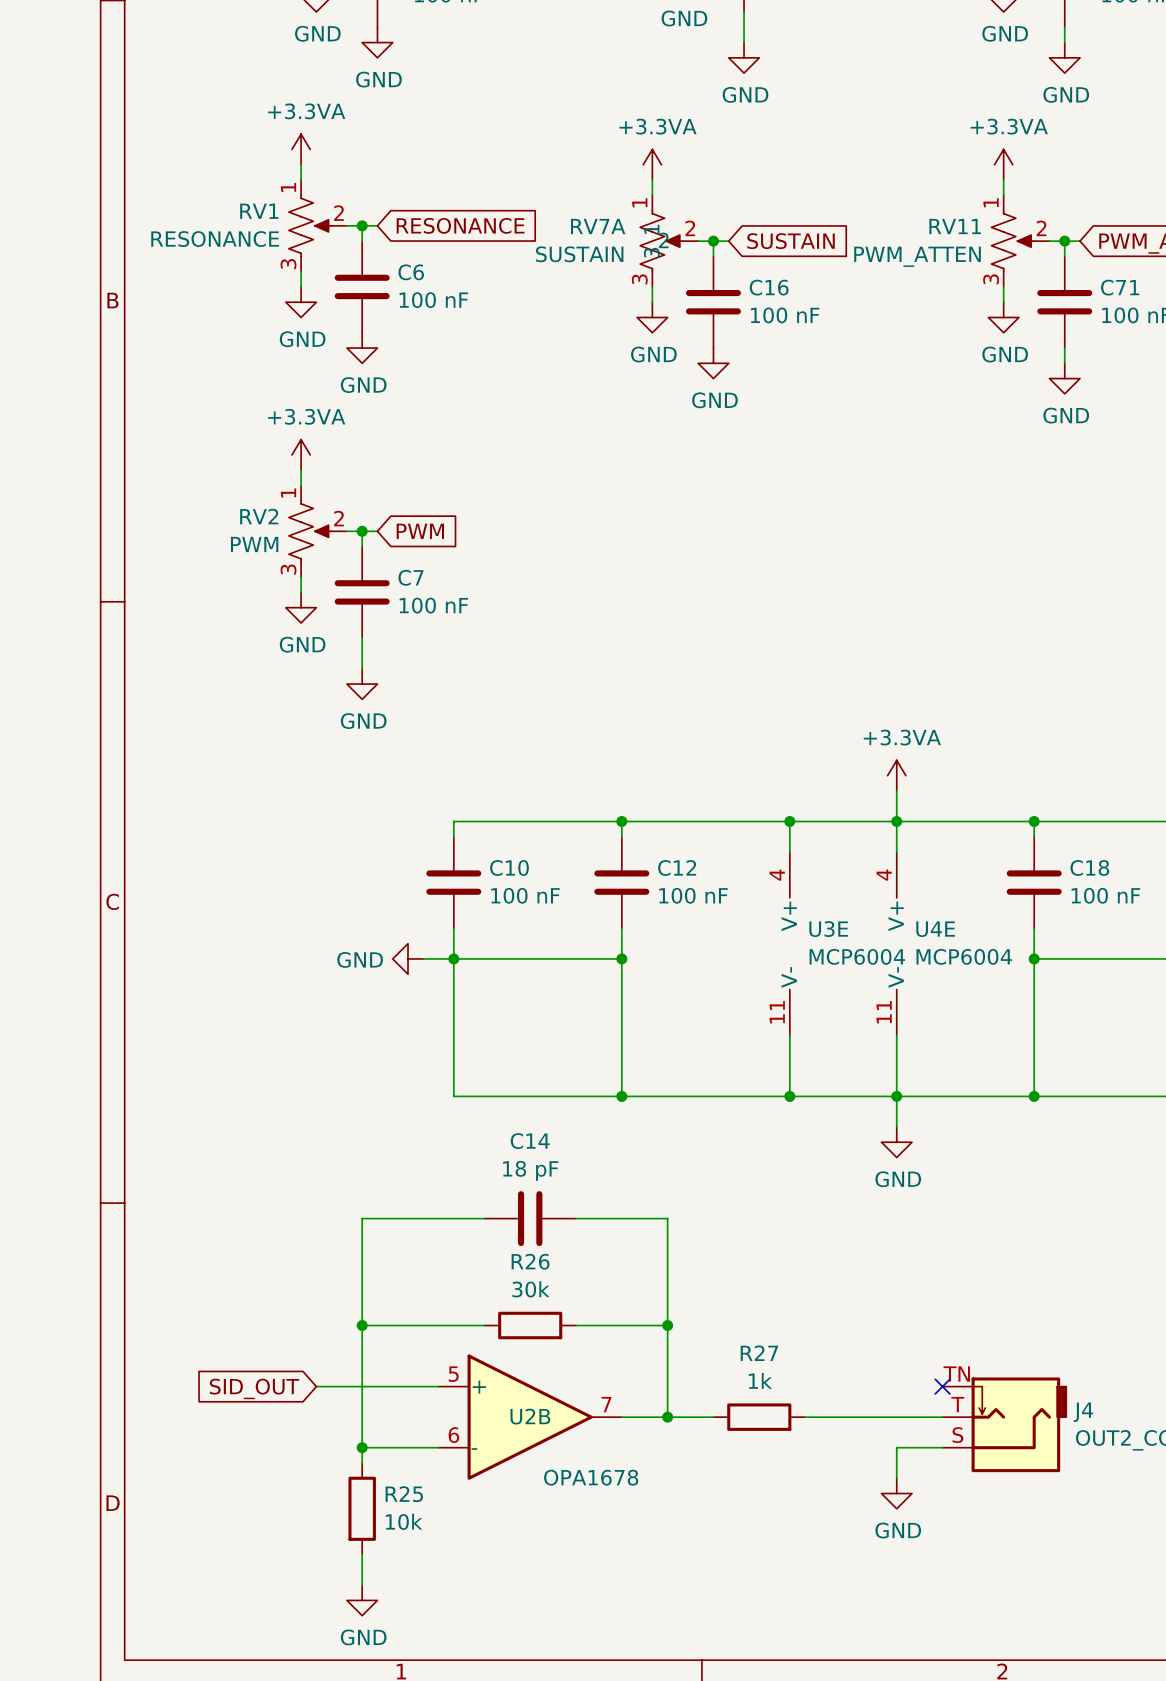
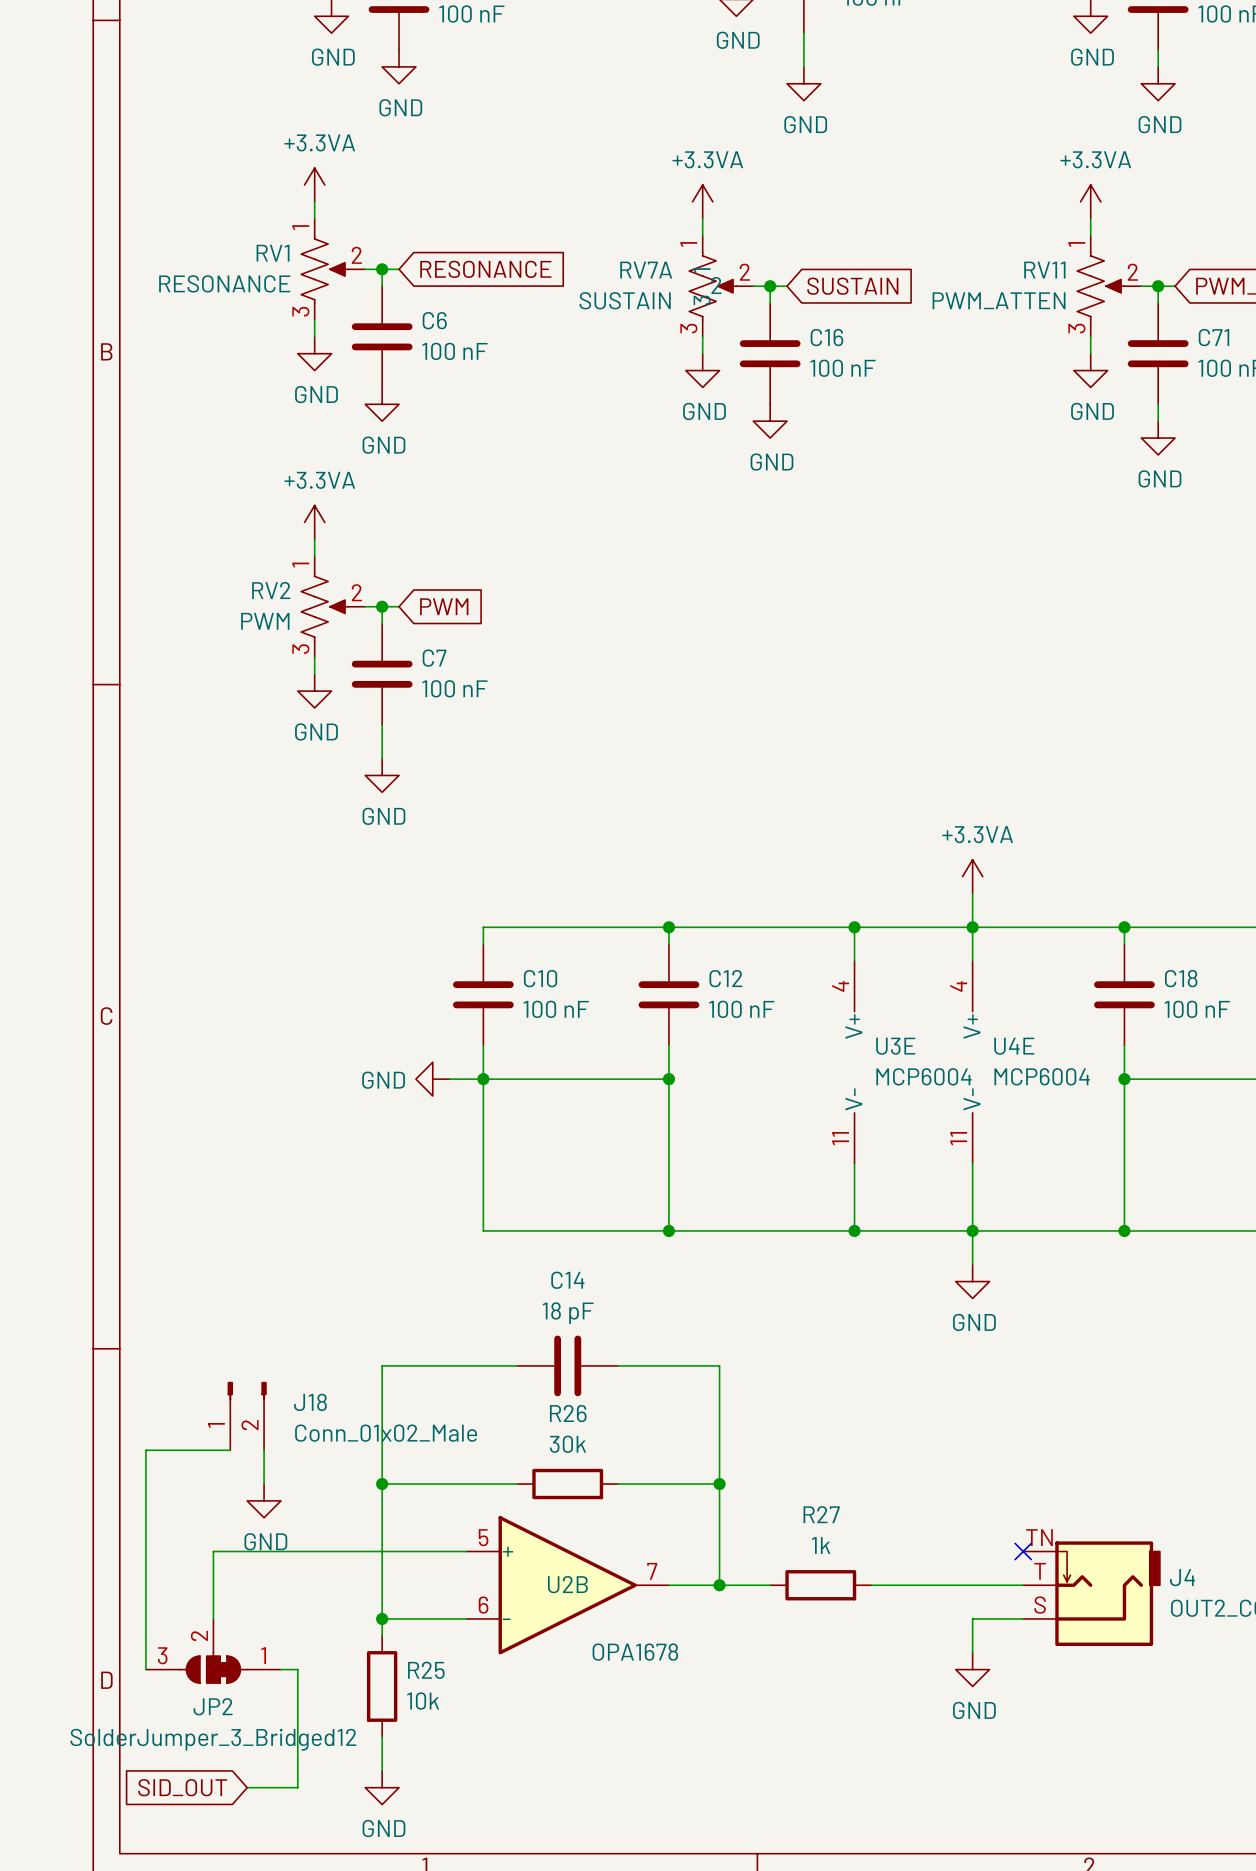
J18: none -> Conn_01x02_Male (247, 1416)
wire: none -> (230, 1450) (145, 1450) (145, 1669)
wire: none -> (264, 1450) (264, 1484)
power symbol: none -> GND (264, 1500)
wire: none -> (331, 1551) (213, 1551) (213, 1618)
global label position: SID_OUT (254, 1388) -> SID_OUT (182, 1787)
JP2: none -> SolderJumper_3_Bridged12 (213, 1651)
wire: none -> (280, 1669) (297, 1669) (297, 1787) (247, 1787)

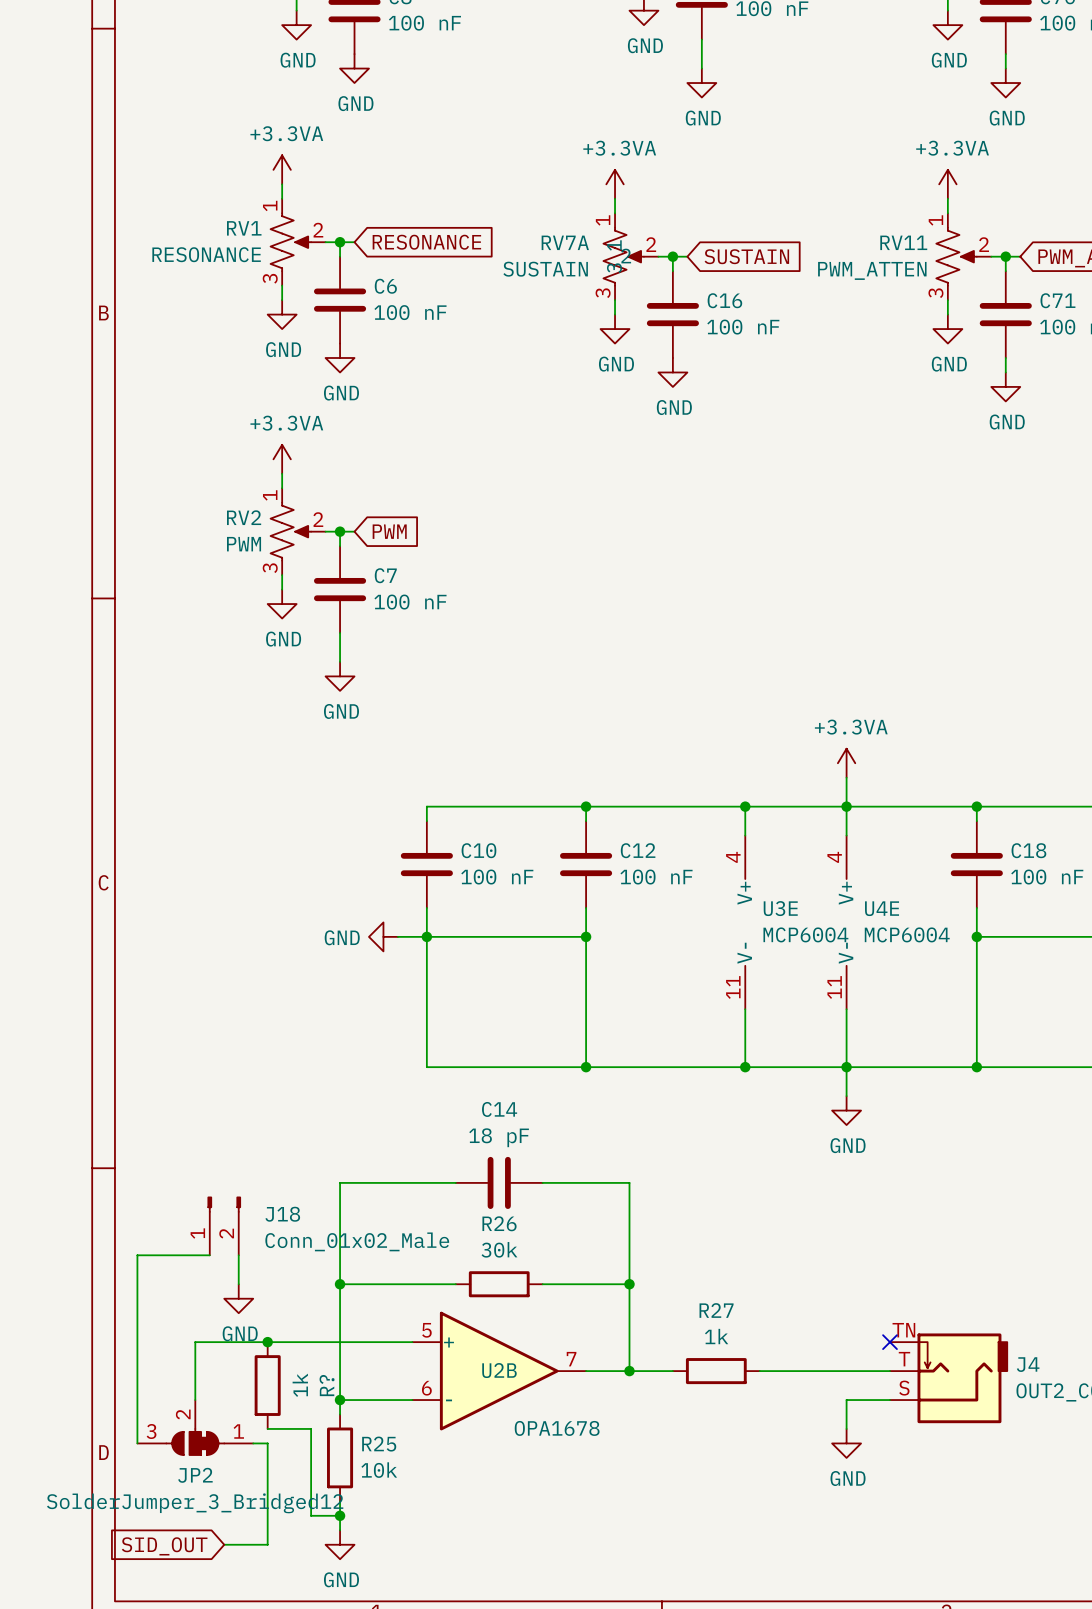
junction: none -> (267, 1342)
R?: none -> 1k (267, 1385)
wire: none -> (267, 1428) (311, 1428) (311, 1515) (340, 1515)
junction: none -> (340, 1515)

